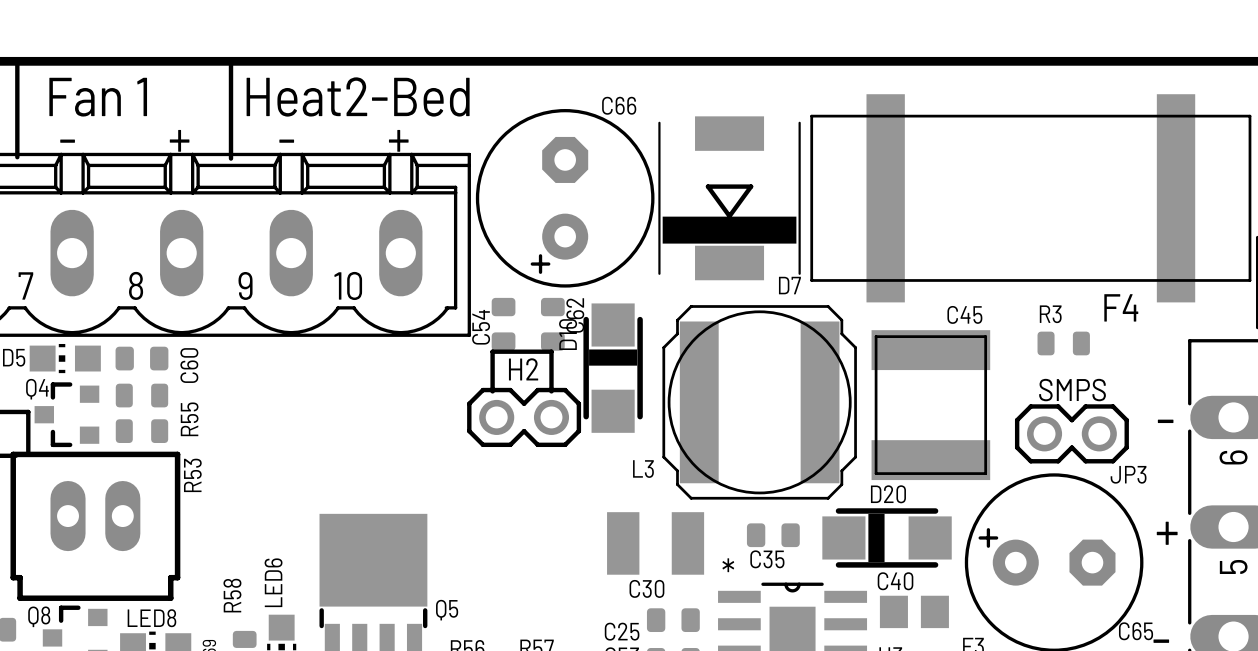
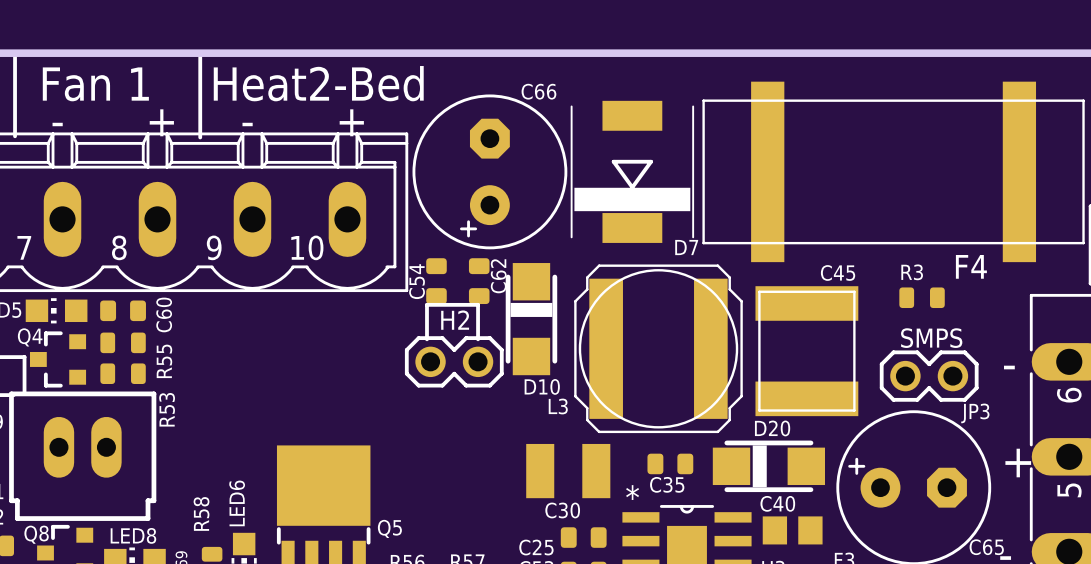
D10 name rotation: 0° (568, 334) -> 90° clockwise (542, 386)
D10 name position: D10 (568, 334) -> D10 (542, 386)

